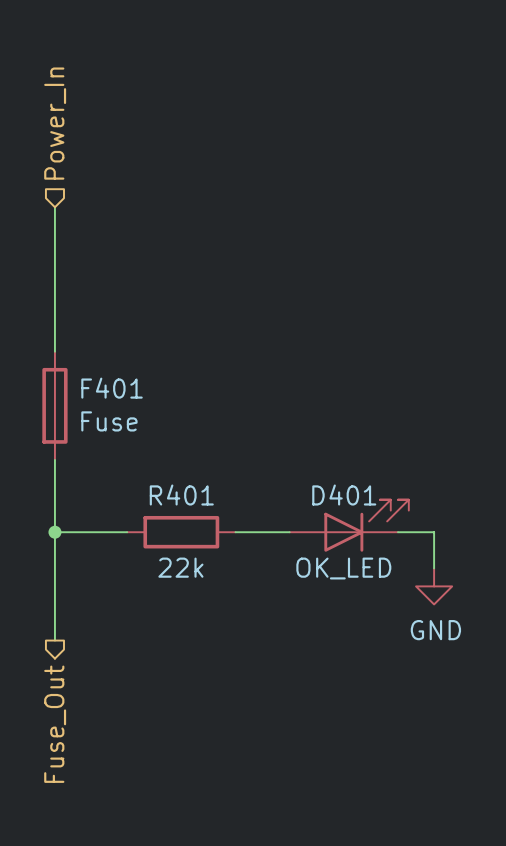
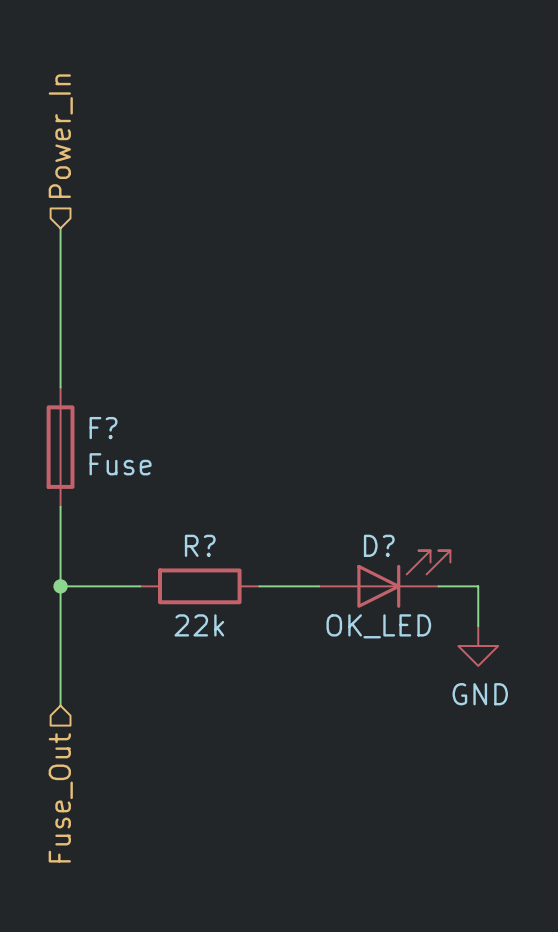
F401 name: F401 (112, 388) -> F? (103, 428)
R401 name: R401 (181, 495) -> R? (200, 545)
D401 name: D401 (344, 495) -> D? (379, 545)
hierarchical label shape: output (55, 724) -> input (60, 797)

